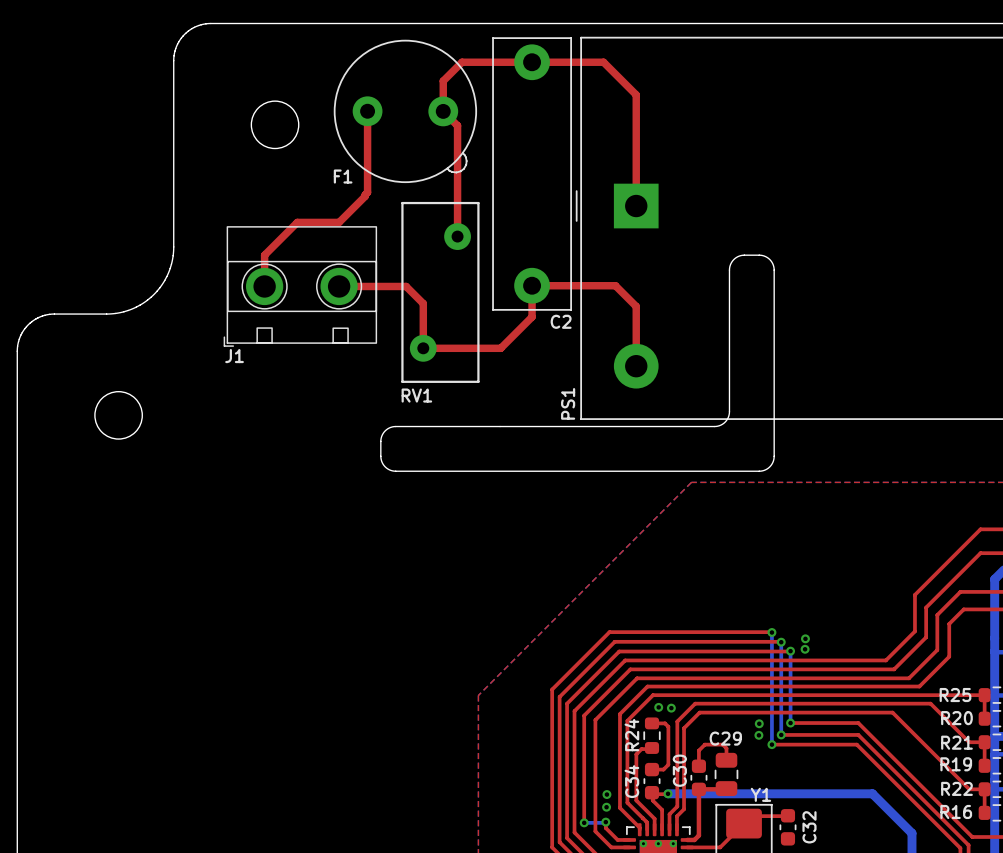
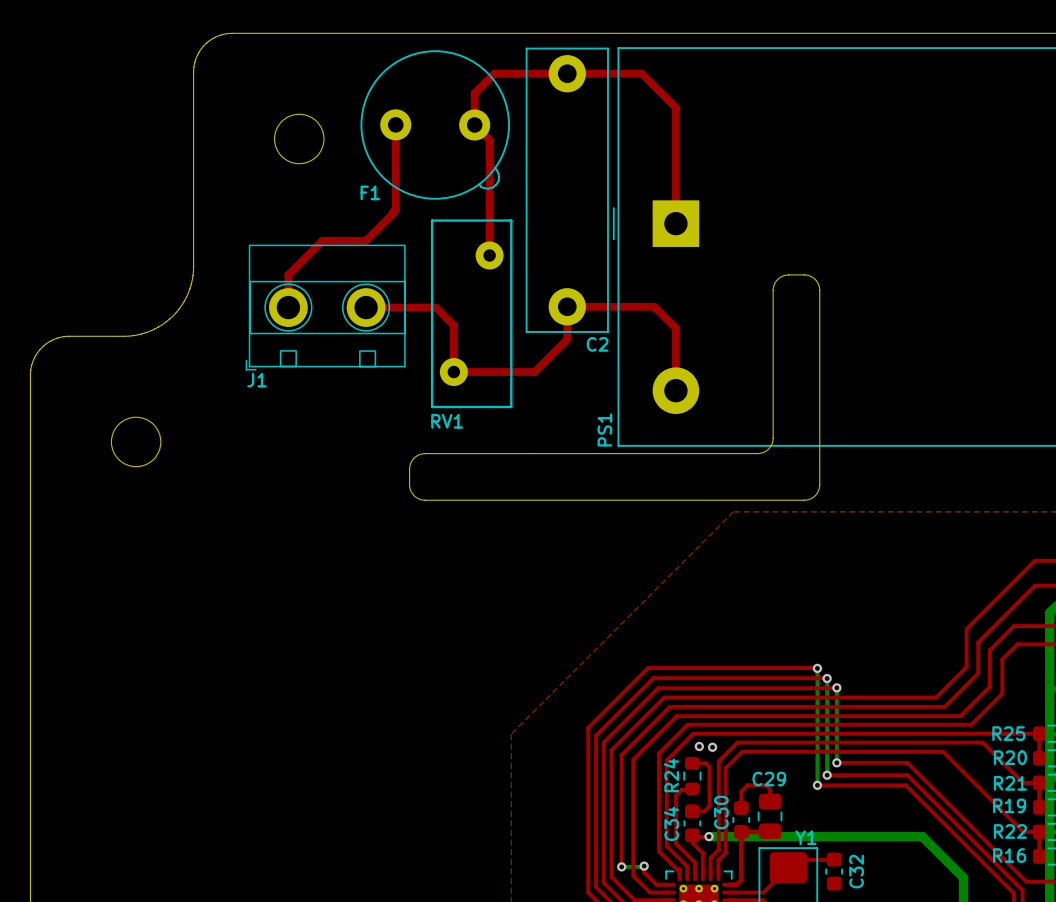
via: (805, 638) -> none
via: (805, 649) -> none
via: (759, 723) -> none
via: (758, 735) -> none
via: (606, 794) -> none
via: (606, 807) -> none

